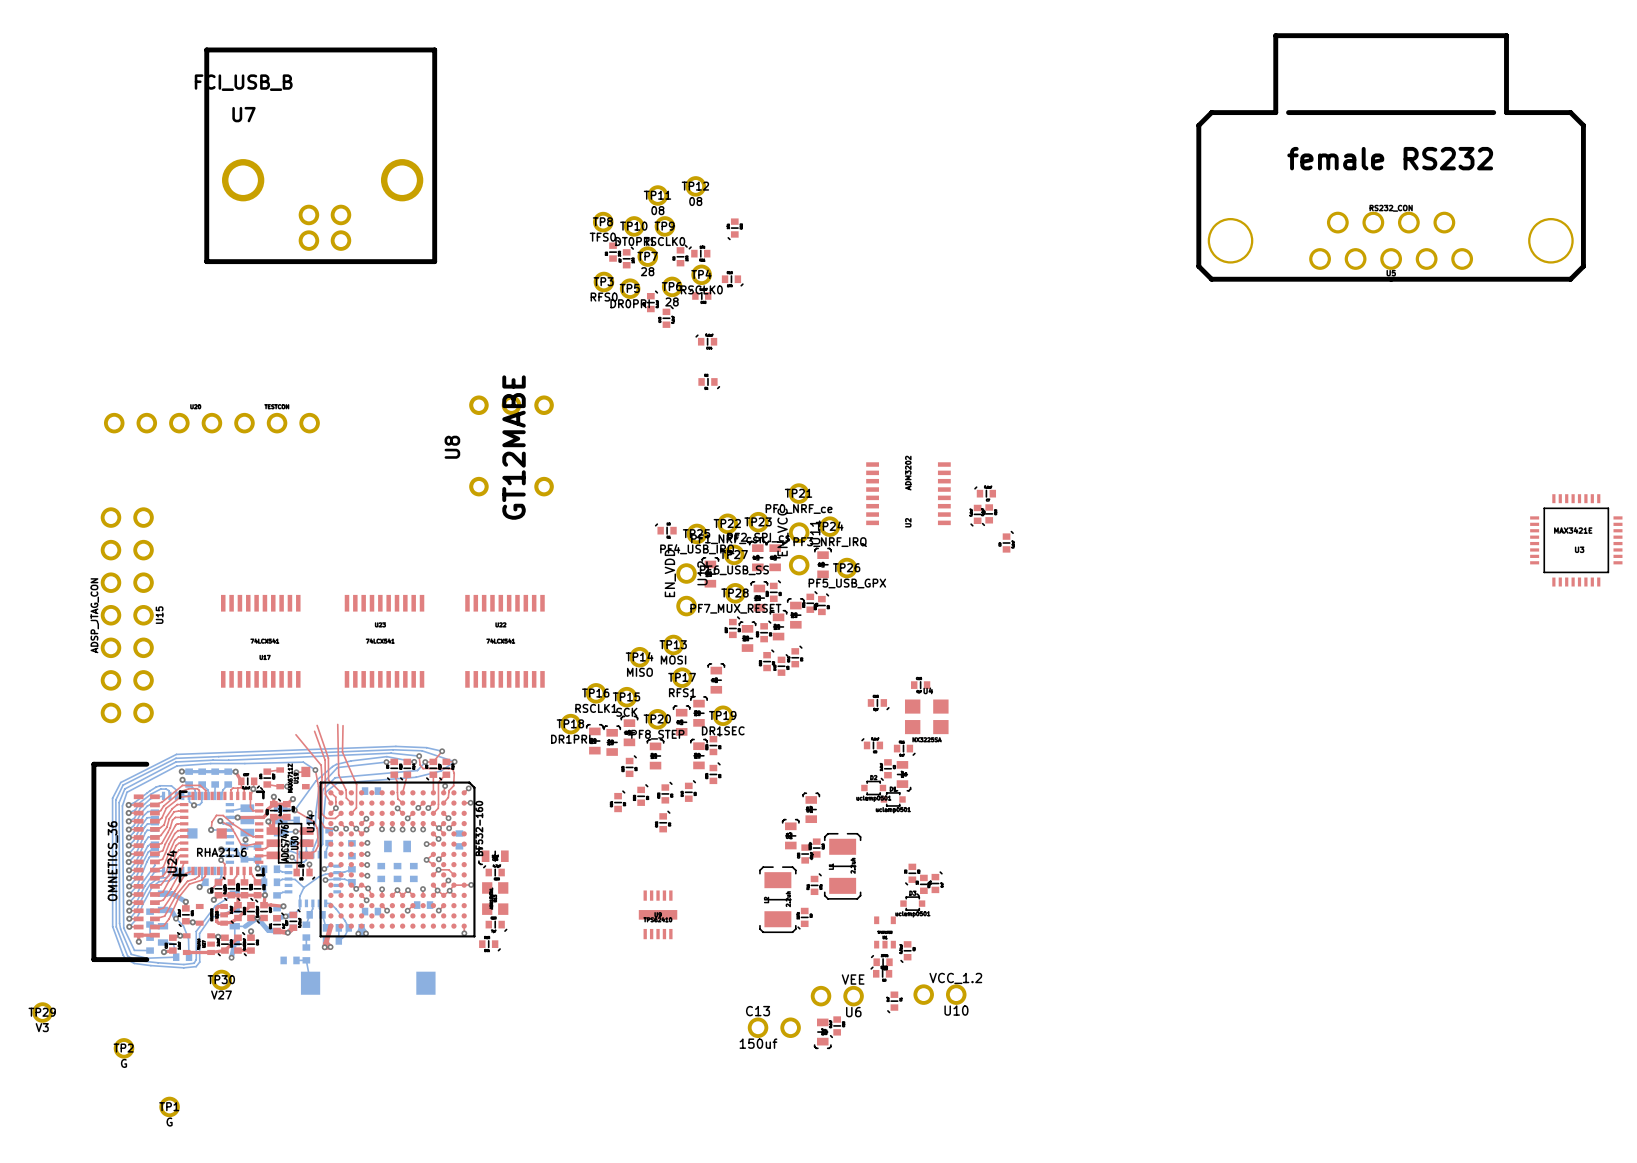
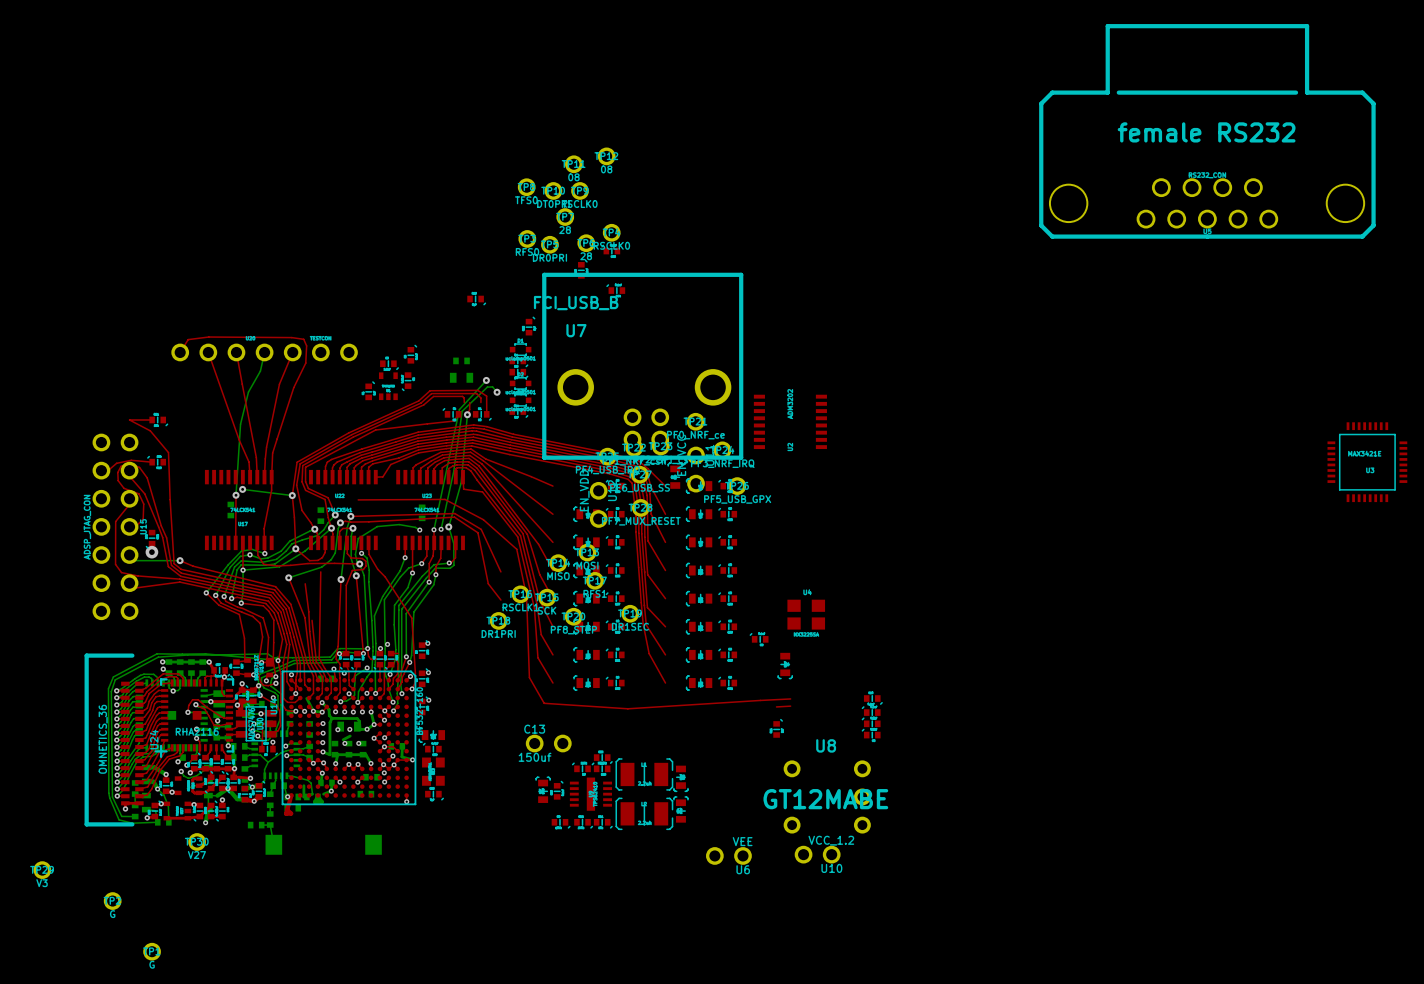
U7 position: (320, 155) -> (642, 366)
part position: (733, 229) -> (150, 539)
part position: (614, 250) -> (423, 649)
part rotation: 0° (699, 252) -> 180° (158, 421)
part position: (699, 252) -> (158, 421)
part position: (682, 255) -> (423, 677)
part position: (628, 257) -> (423, 705)
part rotation: 0° (732, 280) -> 180° (156, 460)
part position: (732, 280) -> (156, 460)
part position: (652, 301) -> (412, 354)
part rotation: 0° (709, 383) -> 180° (451, 412)
part position: (709, 383) -> (451, 412)
top track: none -> (180, 352) (188, 339) (208, 337) (291, 337) (303, 339) (306, 345) (305, 363) (293, 387) (272, 453) (271, 490) (264, 528) (264, 553)
top track: none -> (208, 352) (239, 439) (249, 462) (250, 477)
top track: none -> (236, 352) (256, 457) (257, 477)
bottom track: none -> (264, 352) (260, 371) (248, 392) (240, 424) (236, 495)
top track: none -> (292, 352) (279, 384) (266, 447) (264, 477)
part position: (211, 423) -> (264, 352)
part: none -> (461, 360)
part: none -> (461, 377)
U8 rotation: 0° (511, 445) -> 90° clockwise (827, 796)
U8 position: (511, 445) -> (827, 796)
bottom track: none -> (486, 380) (459, 409) (433, 529)
via: none -> (486, 380)
bottom track: none -> (497, 392) (492, 386) (487, 387) (462, 411) (453, 471) (441, 529)
via: none -> (497, 392)
top track: none -> (464, 402) (462, 396) (433, 396) (423, 404) (353, 437) (302, 465) (302, 481) (305, 490) (325, 499) (332, 534) (332, 542)
top track: none -> (469, 402) (467, 414)
top track: none -> (480, 402) (480, 398) (476, 393) (431, 393) (421, 403) (351, 434) (300, 463) (296, 485) (301, 510) (317, 533) (318, 542)
top track: none -> (458, 413) (454, 421) (375, 430) (305, 467) (305, 481) (308, 488) (328, 497) (335, 514)
bottom track: none -> (467, 414) (461, 483) (448, 526) (453, 543) (453, 565) (450, 568) (435, 568) (401, 609) (401, 693)
via: none -> (467, 414)
top track: none -> (486, 414) (486, 396) (477, 390) (430, 390) (418, 400) (348, 432) (297, 462) (292, 495) (295, 548) (309, 560) (317, 560) (325, 552) (325, 542)
part position: (985, 492) -> (871, 711)
part rotation: 0° (976, 515) -> 90° clockwise (871, 733)
part position: (976, 515) -> (871, 733)
part rotation: 0° (987, 515) -> 90° counterclockwise (873, 699)
part position: (987, 515) -> (873, 699)
part rotation: 0° (665, 529) -> 180° (482, 415)
part position: (665, 529) -> (482, 415)
top track: none -> (152, 462) (131, 460) (116, 463) (101, 476)
part rotation: 0° (1008, 541) -> 90° counterclockwise (871, 722)
part position: (1008, 541) -> (871, 722)
part rotation: 0° (757, 555) -> 90° counterclockwise (586, 514)
part position: (757, 555) -> (586, 514)
top track: none -> (129, 476) (144, 493) (162, 537) (168, 566) (180, 576) (271, 595) (283, 609) (297, 663) (296, 685) (300, 689)
top track: none -> (325, 477) (325, 466) (331, 459) (418, 432) (473, 424) (638, 460) (665, 486)
top track: none -> (332, 477) (332, 467) (337, 462) (360, 452) (418, 435) (473, 427) (636, 463) (645, 470) (650, 486) (665, 514)
top track: none -> (339, 477) (341, 464) (360, 455) (417, 438) (476, 431) (635, 466) (645, 477) (649, 493) (651, 514) (665, 542)
top track: none -> (346, 477) (347, 467) (361, 458) (417, 441) (473, 434) (634, 468) (642, 478) (647, 495) (647, 540) (665, 570)
top track: none -> (354, 477) (354, 467) (362, 460) (418, 444) (473, 437) (632, 471) (640, 479) (644, 501) (647, 574) (665, 598)
top track: none -> (361, 477) (361, 467) (372, 460) (418, 447) (472, 440) (631, 473) (637, 481) (641, 506) (644, 572)
top track: none -> (368, 477) (368, 467) (372, 463) (398, 458) (418, 449) (472, 442) (629, 476) (634, 482) (638, 512) (644, 605)
top track: none -> (375, 477) (382, 476) (390, 464) (418, 452) (471, 445) (628, 479) (632, 483) (636, 516) (643, 623) (649, 653) (665, 683)
top track: none -> (412, 477) (413, 467) (416, 464) (440, 452) (470, 449) (485, 459) (552, 486)
top track: none -> (419, 477) (420, 468) (442, 455) (470, 452) (552, 514)
top track: none -> (426, 477) (427, 467) (434, 462) (443, 457) (469, 455) (481, 463) (552, 542)
top track: none -> (434, 477) (433, 468) (444, 460) (469, 458) (478, 465) (538, 544) (552, 570)
top track: none -> (441, 477) (442, 467) (449, 463) (468, 461) (477, 468) (527, 534) (539, 574) (552, 598)
top track: none -> (448, 477) (448, 468) (456, 464) (467, 464) (474, 470) (523, 533) (539, 600) (552, 626)
top track: none -> (455, 477) (457, 467) (466, 467) (470, 470) (520, 535) (536, 603) (541, 634) (552, 654)
top track: none -> (462, 477) (463, 489) (482, 491) (517, 536) (534, 608) (537, 657) (552, 683)
part rotation: 0° (823, 562) -> 90° counterclockwise (586, 542)
part position: (823, 562) -> (586, 542)
bottom track: none -> (242, 489) (292, 495)
via: none -> (242, 489)
part rotation: 0° (710, 572) -> 90° counterclockwise (586, 598)
part position: (710, 572) -> (586, 598)
top track: none -> (236, 495) (235, 542)
via: none -> (236, 495)
via: none -> (292, 495)
top track: none -> (358, 499) (445, 499) (483, 519) (516, 549) (526, 596) (529, 677) (544, 703) (627, 708) (790, 698)
part rotation: 0° (775, 591) -> 90° counterclockwise (615, 484)
part position: (775, 591) -> (615, 484)
part: none -> (230, 510)
part rotation: 0° (759, 596) -> 90° counterclockwise (586, 570)
part position: (759, 596) -> (586, 570)
part: none -> (422, 512)
bottom track: none -> (335, 514) (317, 535) (291, 543) (276, 559) (262, 562) (241, 560) (234, 567) (224, 596)
via: none -> (335, 514)
part rotation: 0° (811, 601) -> 90° counterclockwise (615, 512)
part position: (811, 601) -> (615, 512)
part: none -> (320, 515)
top track: none -> (350, 516) (454, 513) (481, 529) (500, 571)
bottom track: none -> (350, 516) (347, 527) (341, 579)
via: none -> (350, 516)
part rotation: 0° (823, 604) -> 90° counterclockwise (615, 540)
part position: (823, 604) -> (615, 540)
top track: none -> (340, 522) (454, 517) (477, 532) (488, 583) (500, 600)
bottom track: none -> (340, 522) (335, 552) (331, 559) (321, 567) (288, 577)
via: none -> (340, 522)
part rotation: 0° (795, 613) -> 90° counterclockwise (586, 654)
part position: (795, 613) -> (586, 654)
via: none -> (448, 526)
bottom track: none -> (331, 528) (305, 551) (279, 566) (243, 570) (241, 603)
via: none -> (331, 528)
top track: none -> (352, 528) (342, 528) (339, 531) (339, 542)
bottom track: none -> (352, 528) (351, 558) (356, 575)
via: none -> (352, 528)
bottom track: none -> (314, 529) (289, 541) (281, 551) (267, 558) (260, 558) (250, 554) (240, 556) (230, 567) (215, 595)
via: none -> (314, 529)
via: none -> (419, 530)
top track: none -> (433, 529) (433, 556) (429, 563) (429, 582)
via: none -> (433, 529)
via: none -> (441, 529)
part rotation: 0° (778, 625) -> 90° counterclockwise (586, 683)
part position: (778, 625) -> (586, 683)
part rotation: 0° (734, 627) -> 90° counterclockwise (615, 597)
part position: (734, 627) -> (615, 597)
part rotation: 0° (765, 631) -> 90° counterclockwise (615, 569)
part position: (765, 631) -> (615, 569)
top track: none -> (242, 542) (243, 570)
top track: none -> (257, 542) (257, 555) (263, 564) (276, 565) (307, 563) (359, 564)
top track: none -> (346, 542) (347, 553) (351, 557) (362, 558) (365, 561) (366, 566) (363, 569) (352, 570) (346, 585) (346, 653) (340, 656)
top track: none -> (368, 542) (369, 554) (411, 618) (415, 673) (412, 688)
top track: none -> (405, 542) (405, 557)
top track: none -> (412, 542) (412, 573)
top track: none -> (426, 542) (426, 556) (421, 563)
top track: none -> (441, 542) (440, 558) (436, 566) (435, 574)
top track: none -> (455, 542) (455, 557) (449, 562)
part rotation: 0° (747, 636) -> 90° counterclockwise (586, 626)
part position: (747, 636) -> (586, 626)
bottom track: none -> (295, 548) (274, 564) (241, 564) (237, 569) (231, 598)
via: none -> (295, 548)
part position: (260, 641) -> (239, 510)
part position: (384, 641) -> (430, 510)
part position: (504, 641) -> (343, 510)
via: none -> (151, 552)
bottom track: none -> (361, 553) (366, 558) (369, 570) (373, 650) (371, 670) (358, 691) (358, 702)
via: none -> (361, 553)
bottom track: none -> (264, 553) (251, 549) (241, 551) (206, 592)
via: none -> (264, 553)
via: none -> (250, 554)
bottom track: none -> (405, 557) (400, 570) (382, 596) (374, 615) (375, 693)
via: none -> (405, 557)
bottom track: none -> (129, 560) (180, 560)
via: none -> (180, 560)
part rotation: 0° (796, 656) -> 90° counterclockwise (615, 653)
part position: (796, 656) -> (615, 653)
bottom track: none -> (421, 563) (408, 568) (384, 599) (384, 670) (393, 702)
via: none -> (421, 563)
bottom track: none -> (449, 563) (434, 564) (398, 605) (397, 703) (393, 710)
via: none -> (449, 562)
via: none -> (359, 564)
part rotation: 0° (768, 660) -> 90° counterclockwise (615, 625)
part position: (768, 660) -> (615, 625)
part rotation: 0° (783, 664) -> 90° counterclockwise (615, 681)
part position: (783, 664) -> (615, 681)
via: none -> (243, 570)
top track: none -> (320, 571) (319, 658) (331, 678) (331, 692) (326, 698)
top track: none -> (644, 571) (647, 607) (665, 626)
bottom track: none -> (412, 573) (407, 587) (394, 605) (395, 659) (390, 674)
via: none -> (412, 573)
bottom track: none -> (435, 574) (433, 584) (413, 612) (409, 662)
via: none -> (435, 574)
top track: none -> (356, 575) (363, 653)
via: none -> (356, 575)
top track: none -> (288, 577) (304, 617) (310, 662) (317, 680)
via: none -> (288, 577)
top track: none -> (341, 579) (336, 655) (340, 664) (340, 692) (335, 698)
via: none -> (341, 579)
part rotation: 0° (716, 678) -> 90° counterclockwise (699, 486)
part position: (716, 678) -> (699, 486)
bottom track: none -> (428, 582) (406, 613) (406, 656)
via: none -> (429, 582)
top track: none -> (305, 583) (313, 662) (322, 677) (322, 693) (317, 698)
part position: (921, 686) -> (476, 300)
top track: none -> (206, 592) (218, 605) (239, 614) (244, 638) (244, 660)
via: none -> (206, 592)
top track: none -> (215, 595) (221, 602) (252, 616) (260, 623) (262, 636) (257, 667) (258, 672) (263, 685) (275, 683)
via: none -> (215, 595)
top track: none -> (224, 596) (225, 601) (263, 618) (268, 637) (266, 662)
via: none -> (224, 596)
via: none -> (231, 598)
top track: none -> (241, 603) (263, 605) (273, 620) (273, 661) (275, 676)
via: none -> (241, 603)
part rotation: 0° (878, 704) -> 90° counterclockwise (530, 326)
part position: (878, 704) -> (530, 326)
top track: none -> (644, 605) (646, 625) (665, 654)
part rotation: 0° (698, 711) -> 90° counterclockwise (699, 598)
part position: (698, 711) -> (699, 598)
part rotation: 0° (681, 720) -> 90° counterclockwise (699, 542)
part position: (681, 720) -> (699, 542)
top track: none -> (312, 620) (316, 661) (326, 680)
top track: (337, 724) (338, 775) (346, 789) -> (152, 419) (129, 419) (150, 430) (168, 452) (174, 563) (181, 569) (274, 589) (288, 607) (304, 663) (304, 677)
top track: (317, 725) (328, 758) (328, 780) (341, 792) -> (129, 532) (143, 519) (143, 504) (138, 493) (124, 488) (118, 480) (117, 472) (121, 466) (130, 464) (139, 467) (147, 477) (166, 537) (171, 565) (181, 573) (272, 592) (286, 609) (300, 663) (300, 680)
top track: (343, 725) (342, 752) (356, 784) (356, 807) -> (180, 560) (193, 566) (275, 586) (290, 604) (307, 662) (313, 676) (313, 693)
part rotation: 0° (629, 730) -> 90° counterclockwise (699, 514)
part position: (629, 730) -> (699, 514)
top track: (314, 731) (325, 760) (325, 793) (330, 803) -> (129, 504) (115, 521) (115, 564) (121, 572) (137, 575) (179, 579) (269, 597) (280, 611) (287, 633) (289, 644) (286, 681) (291, 689)
top track: (295, 734) (321, 765) (321, 814) -> (129, 588) (179, 582) (268, 601) (278, 613) (286, 644) (283, 662) (283, 698)
part rotation: 0° (594, 739) -> 90° counterclockwise (699, 570)
part position: (594, 739) -> (699, 570)
part rotation: 0° (612, 740) -> 90° counterclockwise (699, 626)
part position: (612, 740) -> (699, 626)
part rotation: 0° (715, 744) -> 90° counterclockwise (727, 484)
part position: (715, 744) -> (727, 484)
via: none -> (427, 643)
part rotation: 0° (904, 750) -> 90° counterclockwise (778, 728)
part position: (904, 750) -> (778, 728)
top track: (442, 751) (433, 761) (425, 762) -> none
bottom track: (442, 751) (426, 747) (395, 746) (176, 754) (120, 782) (112, 798) (112, 926) (125, 958) (134, 963) (150, 965) (183, 967) (196, 966) (199, 962) (199, 933) (210, 917) -> none
part rotation: 0° (698, 753) -> 90° counterclockwise (699, 654)
part position: (698, 753) -> (699, 654)
part rotation: 0° (655, 754) -> 90° counterclockwise (699, 683)
part position: (655, 754) -> (699, 683)
bottom track: (419, 756) (391, 753) (176, 761) (124, 788) -> (419, 530) (399, 524) (377, 526) (358, 538) (355, 554) (364, 575) (367, 648) (336, 649) (330, 657) (277, 657) (269, 659) (205, 653) (157, 653) (113, 676)
via: none -> (380, 648)
bottom track: (414, 761) (386, 756) (336, 764) (315, 781) (294, 810) -> (363, 653) (338, 651) (331, 659) (293, 660) (259, 674) (260, 695)
via: (454, 761) -> none
bottom track: (386, 762) (337, 767) (319, 787) (315, 824) -> (340, 656) (336, 662) (294, 663) (261, 677) (264, 687) (277, 695) (278, 707)
bottom track: (425, 762) (417, 770) (335, 777) (322, 789) (317, 837) -> (275, 676) (272, 678) (270, 686) (280, 693) (280, 719)
via: (425, 762) -> none
top track: none -> (406, 656) (397, 680)
via: none -> (406, 656)
part rotation: 0° (631, 766) -> 90° counterclockwise (727, 512)
part position: (631, 766) -> (727, 512)
top track: (315, 770) (318, 786) (318, 817) -> (231, 598) (237, 597) (265, 603) (274, 612) (282, 639) (278, 662) (280, 673) (280, 701)
part rotation: 0° (886, 770) -> 90° counterclockwise (389, 365)
part position: (886, 770) -> (389, 365)
top track: none -> (409, 662) (397, 689)
via: none -> (409, 662)
part rotation: 0° (715, 773) -> 90° counterclockwise (727, 597)
part position: (715, 773) -> (727, 597)
bottom track: none -> (367, 667) (355, 675) (354, 695) (346, 700) (340, 701)
via: none -> (367, 667)
top track: none -> (333, 669) (335, 680)
via: none -> (333, 669)
via: none -> (428, 672)
via: none -> (344, 673)
top track: none -> (266, 674) (266, 680)
via: none -> (291, 674)
via: none -> (275, 676)
part position: (873, 788) -> (520, 383)
part rotation: 0° (690, 791) -> 90° counterclockwise (727, 653)
part position: (690, 791) -> (727, 653)
part rotation: 0° (666, 792) -> 90° counterclockwise (727, 540)
part position: (666, 792) -> (727, 540)
via: none -> (266, 680)
part rotation: 0° (642, 795) -> 90° counterclockwise (727, 625)
part position: (642, 795) -> (727, 625)
via: none -> (275, 683)
part position: (893, 799) -> (520, 349)
part rotation: 0° (619, 801) -> 90° counterclockwise (727, 569)
part position: (619, 801) -> (727, 569)
part rotation: 0° (811, 807) -> 180° (680, 778)
part position: (811, 807) -> (680, 778)
via: none -> (401, 693)
bottom track: none -> (306, 698) (313, 711) (322, 712)
via: none -> (428, 700)
via: none -> (340, 701)
bottom track: none -> (322, 702) (329, 709) (329, 715) (332, 718)
part rotation: 0° (664, 821) -> 90° counterclockwise (727, 681)
part position: (664, 821) -> (727, 681)
top track: none -> (790, 706) (776, 706)
bottom track: none -> (371, 712) (374, 724) (367, 729) (360, 729) (357, 718) (332, 718)
part position: (790, 834) -> (680, 809)
bottom track: none -> (332, 718) (330, 722) (329, 754) (323, 751)
part rotation: 0° (459, 839) -> 90° clockwise (396, 746)
part position: (459, 839) -> (396, 746)
via: none -> (349, 729)
via: none -> (367, 729)
part rotation: 0° (815, 849) -> 90° clockwise (601, 767)
part position: (815, 849) -> (601, 767)
via: none -> (337, 729)
part rotation: 0° (806, 852) -> 90° clockwise (603, 758)
part position: (806, 852) -> (603, 758)
bottom track: (319, 854) (322, 844) (325, 792) (336, 783) (416, 777) (440, 771) (454, 761) (422, 750) (393, 749) (176, 758) (123, 785) (115, 799) (116, 927) (127, 956) (135, 960) (158, 962) (194, 963) (196, 959) (196, 931) (215, 906) (234, 893) -> (181, 771) (188, 778) (196, 775) (208, 767)
bottom track: none -> (350, 736) (343, 739)
via: none -> (344, 743)
via: none -> (358, 743)
part rotation: 0° (842, 866) -> 90° clockwise (644, 774)
part position: (842, 866) -> (644, 774)
bottom track: none -> (402, 746) (401, 756) (412, 759)
part rotation: 0° (910, 874) -> 90° counterclockwise (518, 373)
part position: (910, 874) -> (518, 373)
part rotation: 0° (937, 882) -> 90° clockwise (518, 412)
part position: (937, 882) -> (518, 412)
part rotation: 0° (816, 884) -> 90° clockwise (603, 823)
part position: (816, 884) -> (603, 823)
part rotation: 0° (922, 885) -> 90° counterclockwise (518, 362)
part position: (922, 885) -> (518, 362)
bottom track: none -> (370, 763) (365, 754) (337, 754) (335, 763)
via: none -> (181, 771)
via: none -> (384, 772)
part rotation: 0° (777, 899) -> 90° clockwise (644, 813)
part position: (777, 899) -> (644, 813)
bottom track: none -> (322, 773) (320, 782)
bottom track: (325, 903) (330, 903) (336, 908) (348, 927) (344, 936) (338, 940) (338, 927) -> (286, 775) (307, 780) (311, 783) (312, 794) (303, 796) (303, 785)
part position: (912, 903) -> (520, 400)
bottom track: none -> (332, 782) (331, 791) (323, 794)
part rotation: 0° (658, 914) -> 90° clockwise (590, 794)
part rotation: 0° (803, 918) -> 90° clockwise (581, 767)
part position: (803, 918) -> (581, 767)
via: none -> (331, 791)
via: none -> (287, 796)
part position: (884, 932) -> (388, 386)
via: (358, 933) -> none
via: (365, 933) -> none
part side: top (490, 945) -> bottom (365, 794)
via: (324, 947) -> none
via: (330, 947) -> none
part position: (905, 952) -> (406, 381)
part rotation: 0° (881, 960) -> 180° (583, 823)
part position: (881, 960) -> (583, 823)
part rotation: 0° (881, 972) -> 180° (561, 823)
part position: (881, 972) -> (561, 823)
part rotation: 0° (892, 1002) -> 180° (370, 390)
part position: (892, 1002) -> (370, 390)
C13 position: (774, 1027) -> (548, 743)
part rotation: 0° (835, 1027) -> 180° (558, 790)
part position: (835, 1027) -> (558, 790)
part rotation: 0° (822, 1033) -> 180° (543, 789)
part position: (822, 1033) -> (543, 789)

